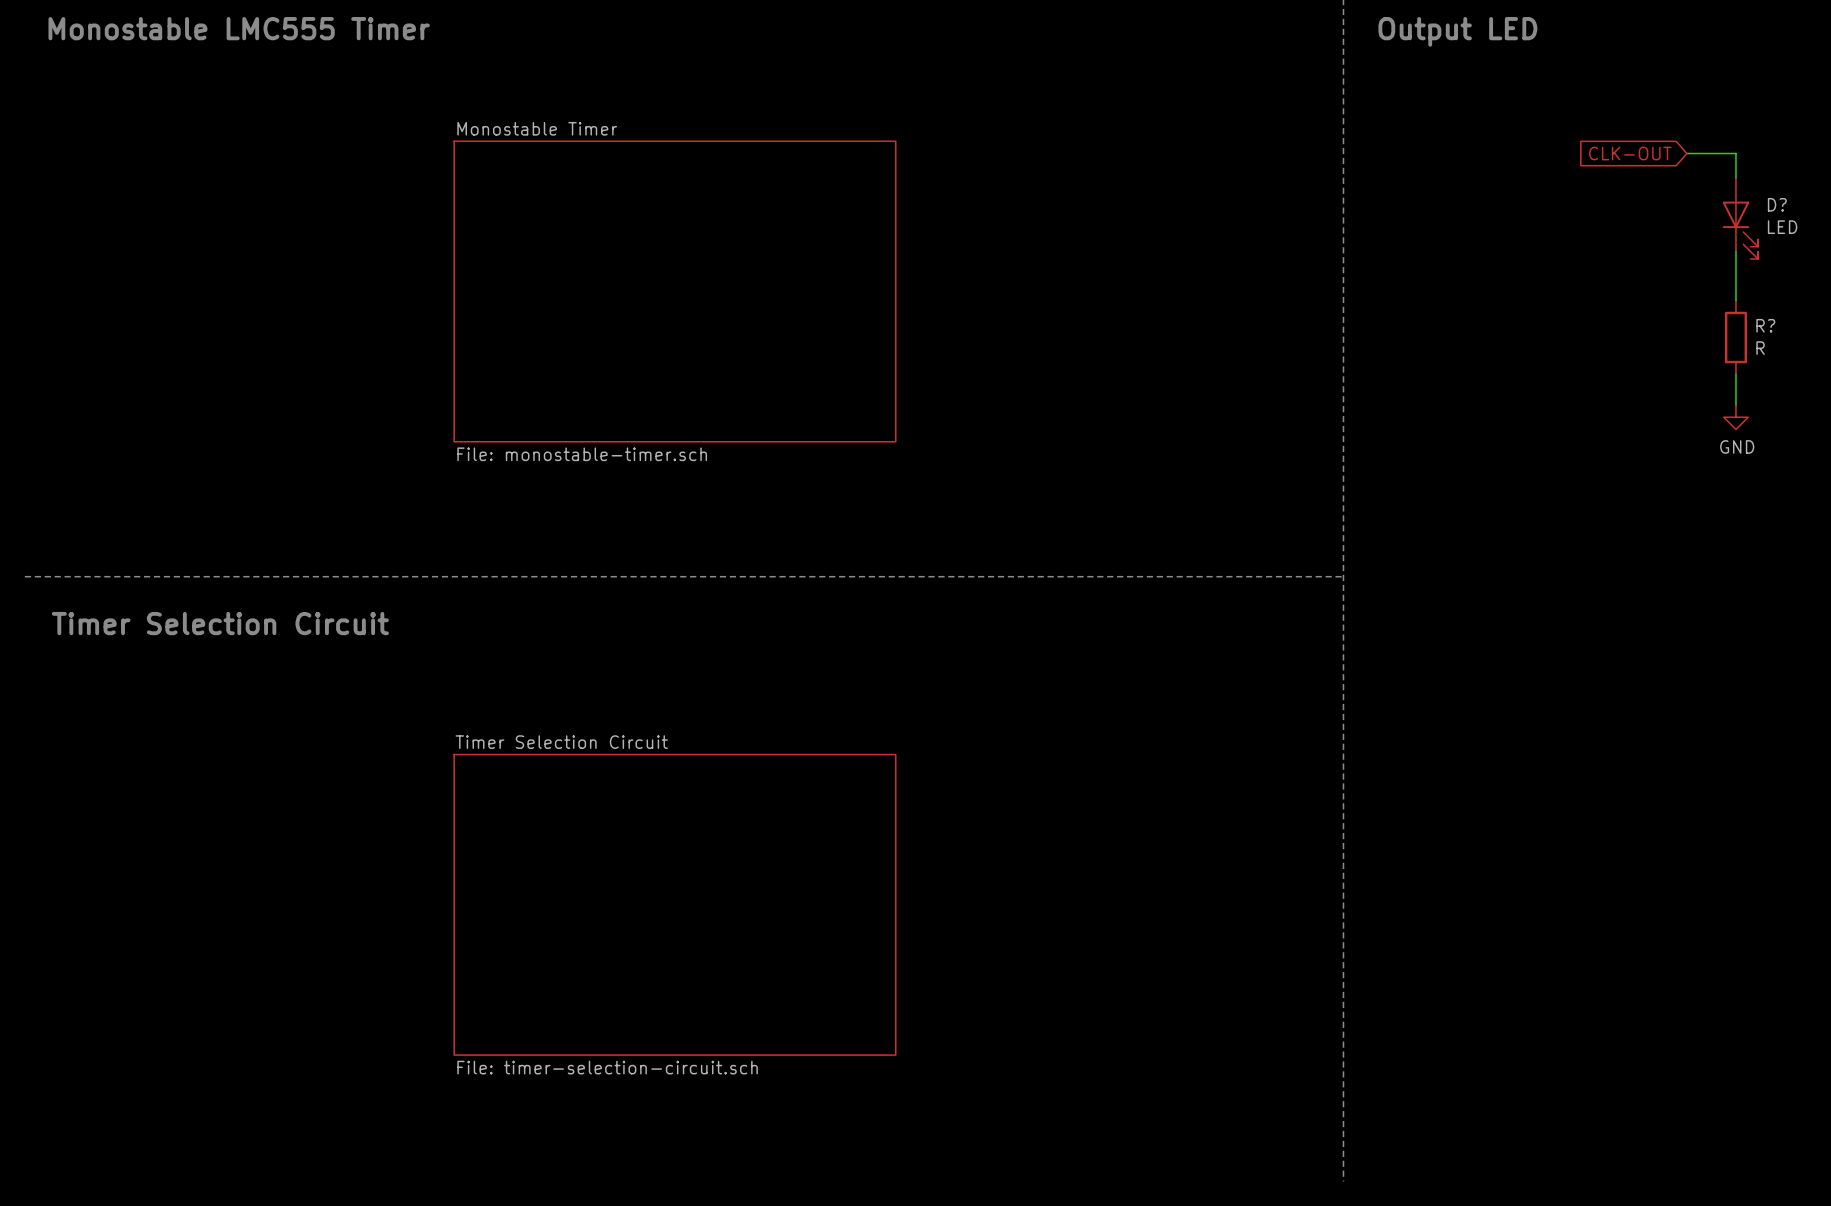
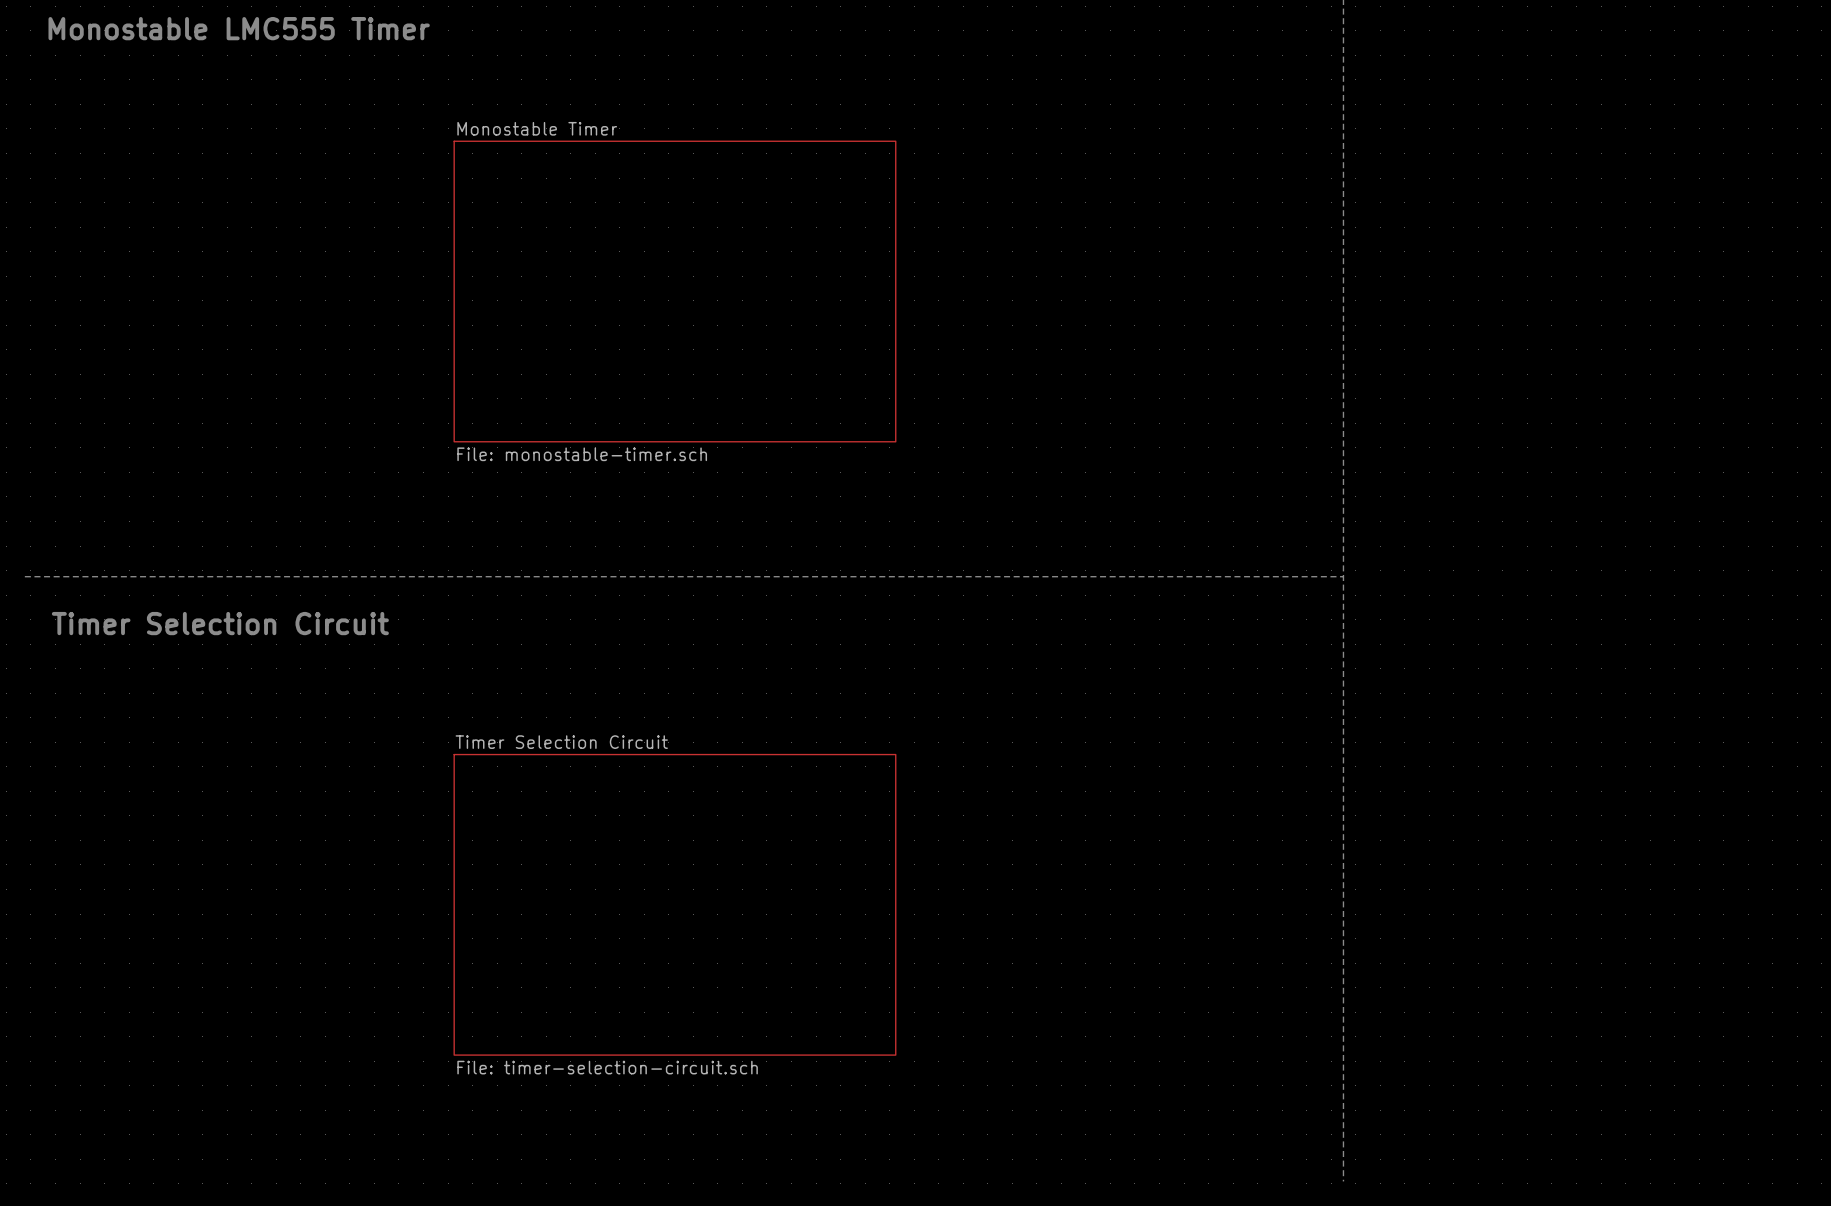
text: Output LED (1457, 31) -> none
global label: CLK-OUT (1630, 153) -> none
wire: (1686, 153) (1735, 153) (1735, 178) -> none
D?: LED (1740, 218) -> none
wire: (1735, 251) (1735, 300) -> none
R?: R (1735, 337) -> none
wire: (1735, 374) (1735, 404) -> none
power symbol: GND (1735, 417) -> none

